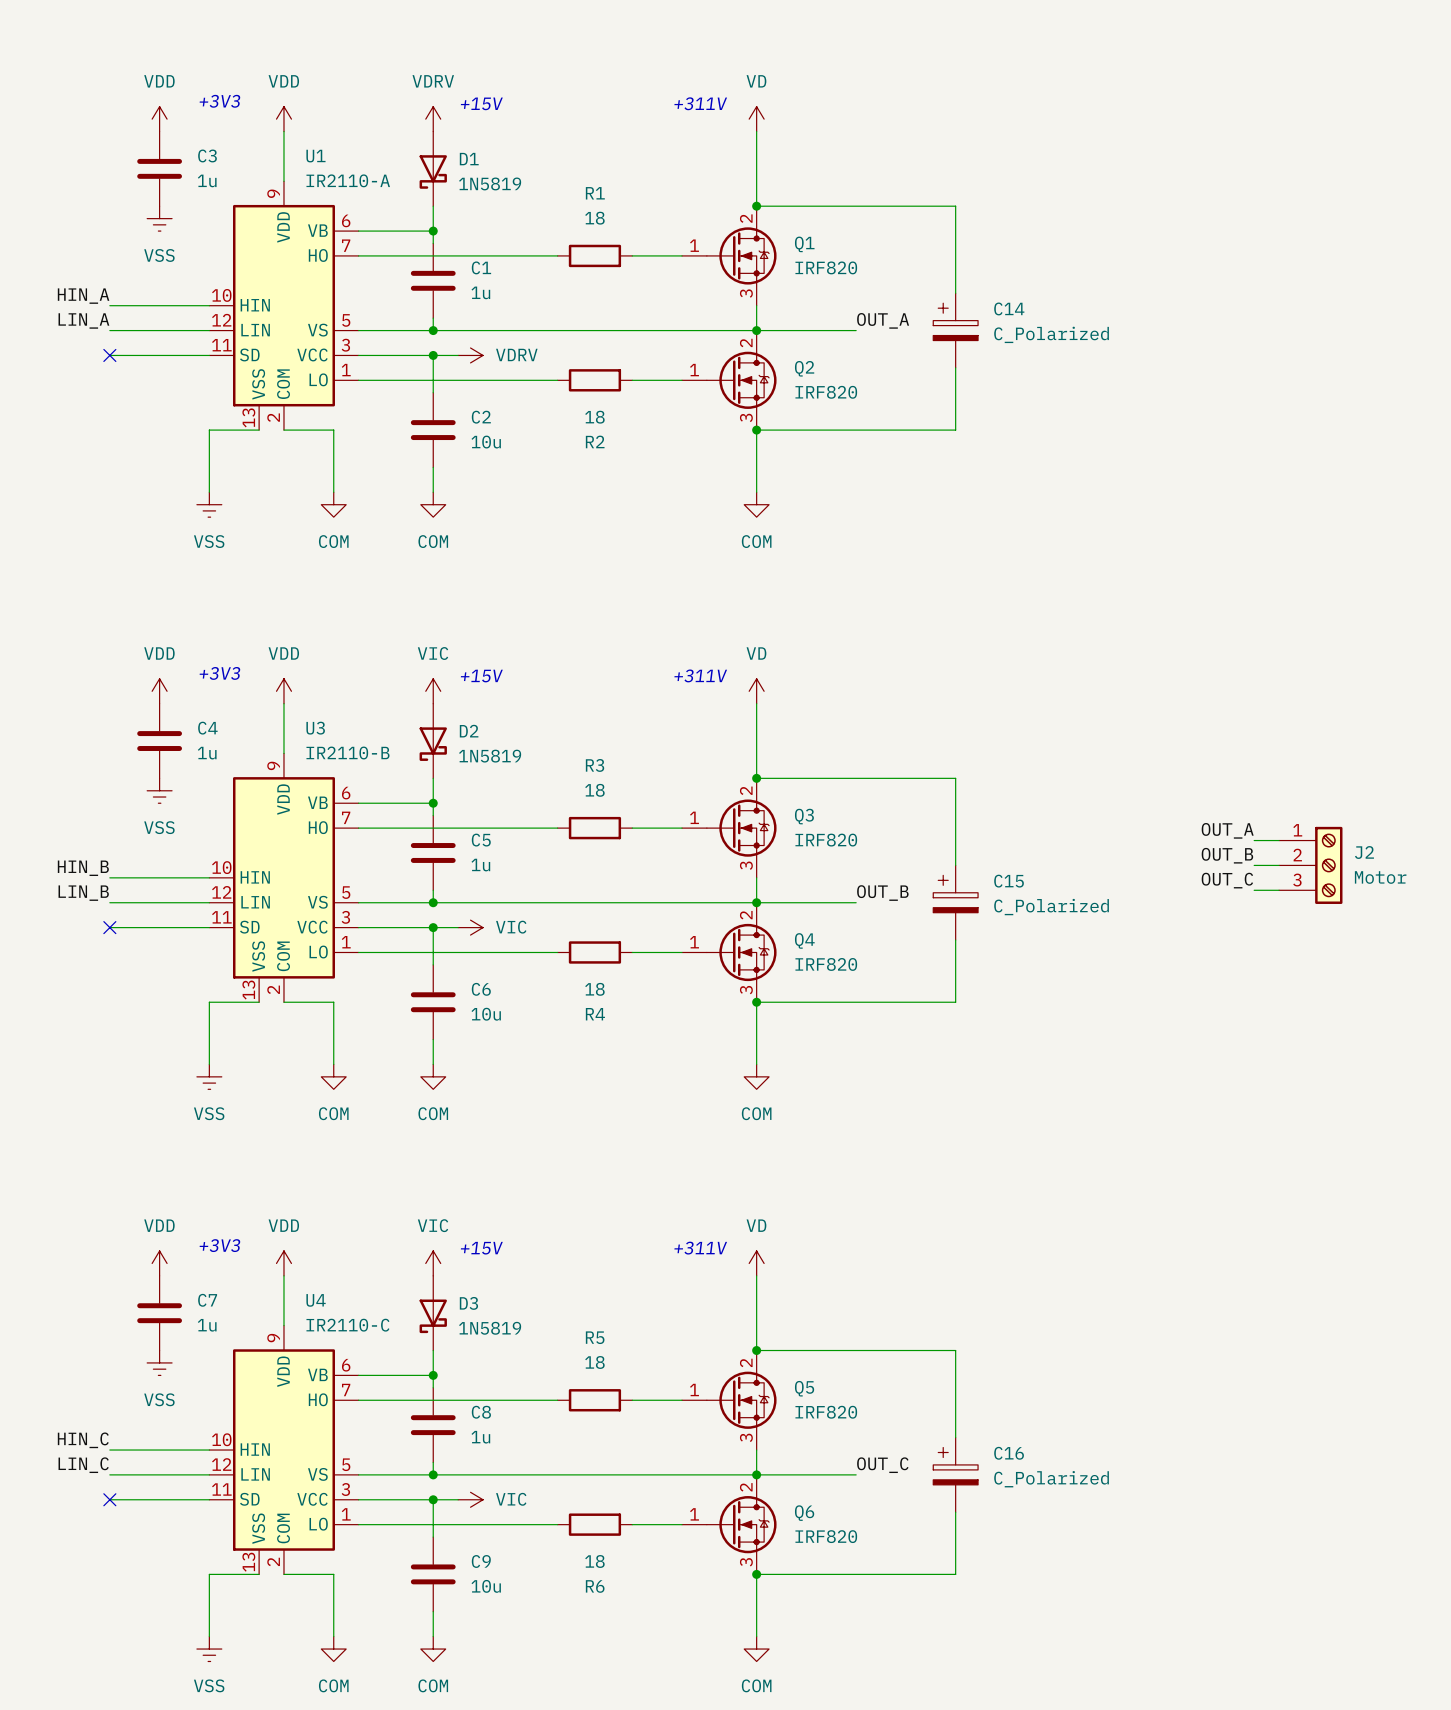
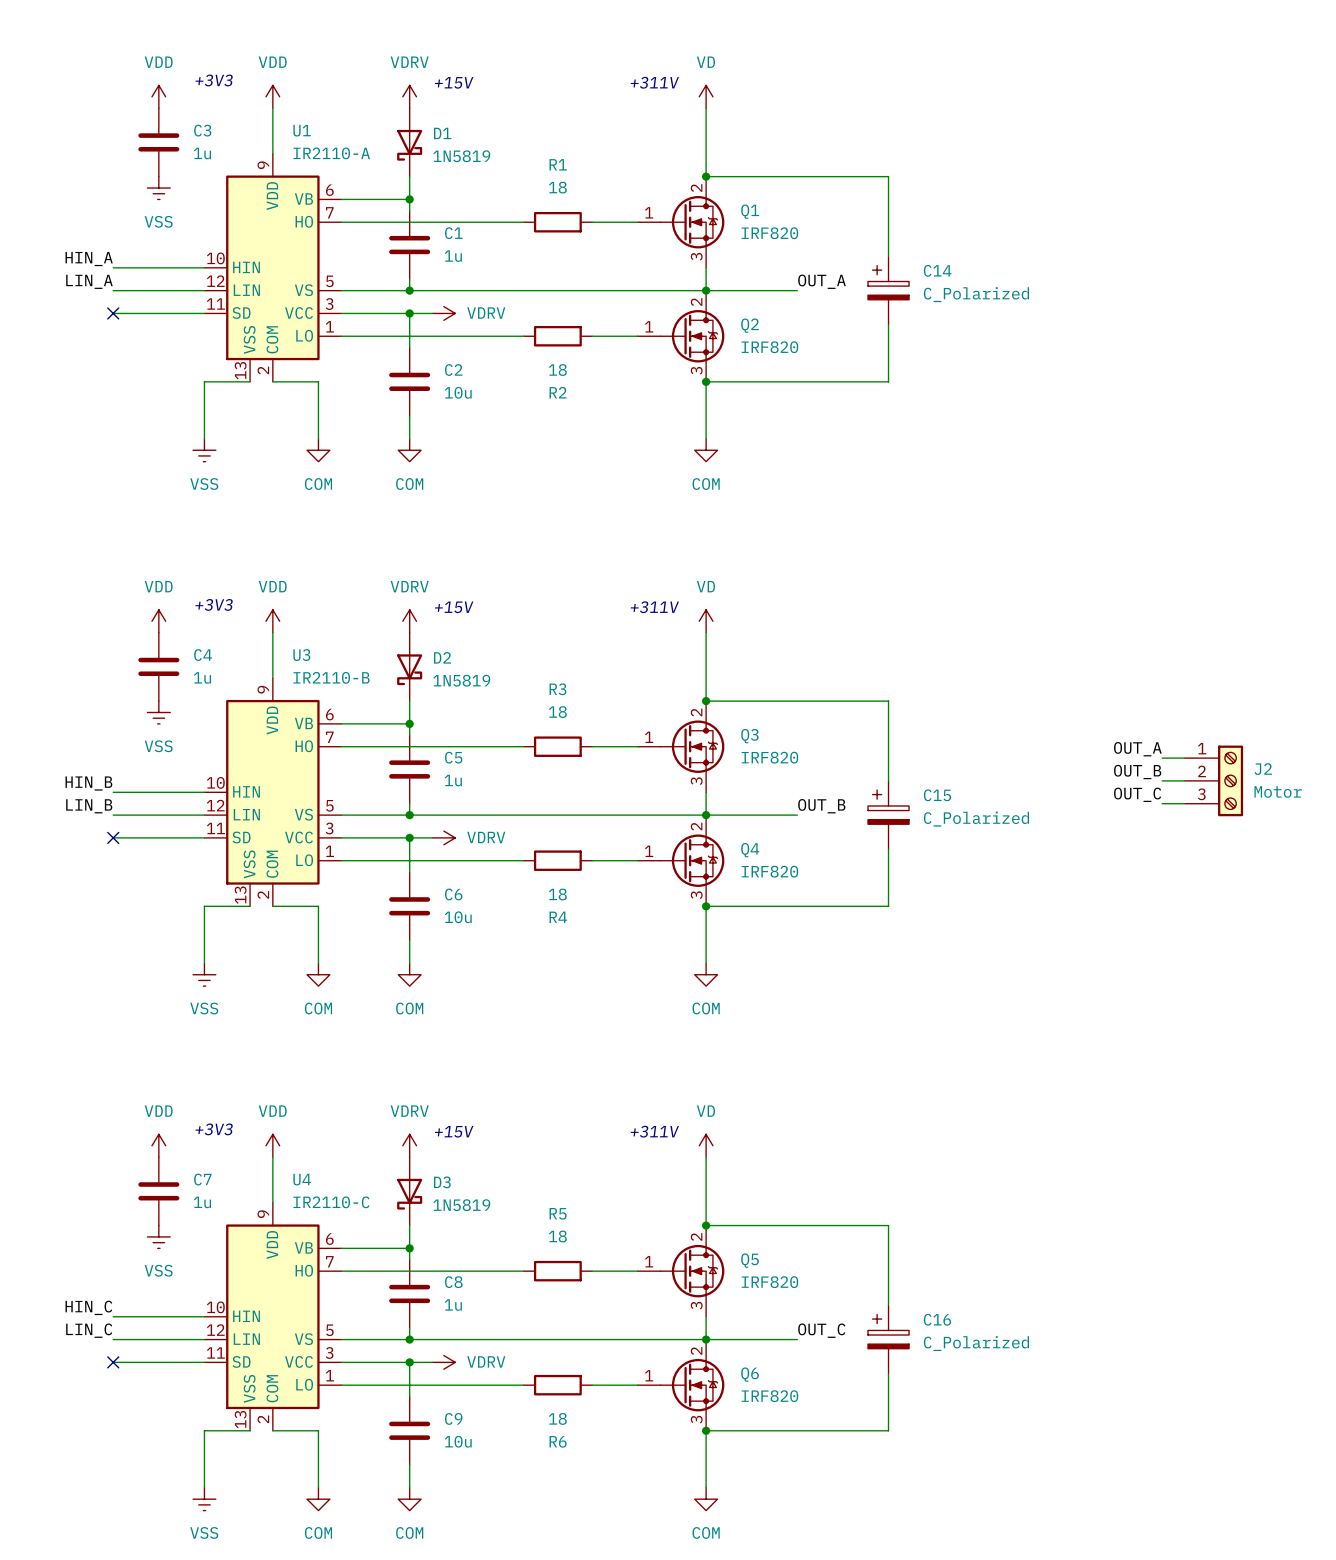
power symbol: VIC (433, 691) -> VDRV (409, 621)
power symbol: VIC (470, 927) -> VDRV (443, 837)
power symbol: VIC (433, 1263) -> VDRV (409, 1145)
power symbol: VIC (470, 1499) -> VDRV (443, 1362)

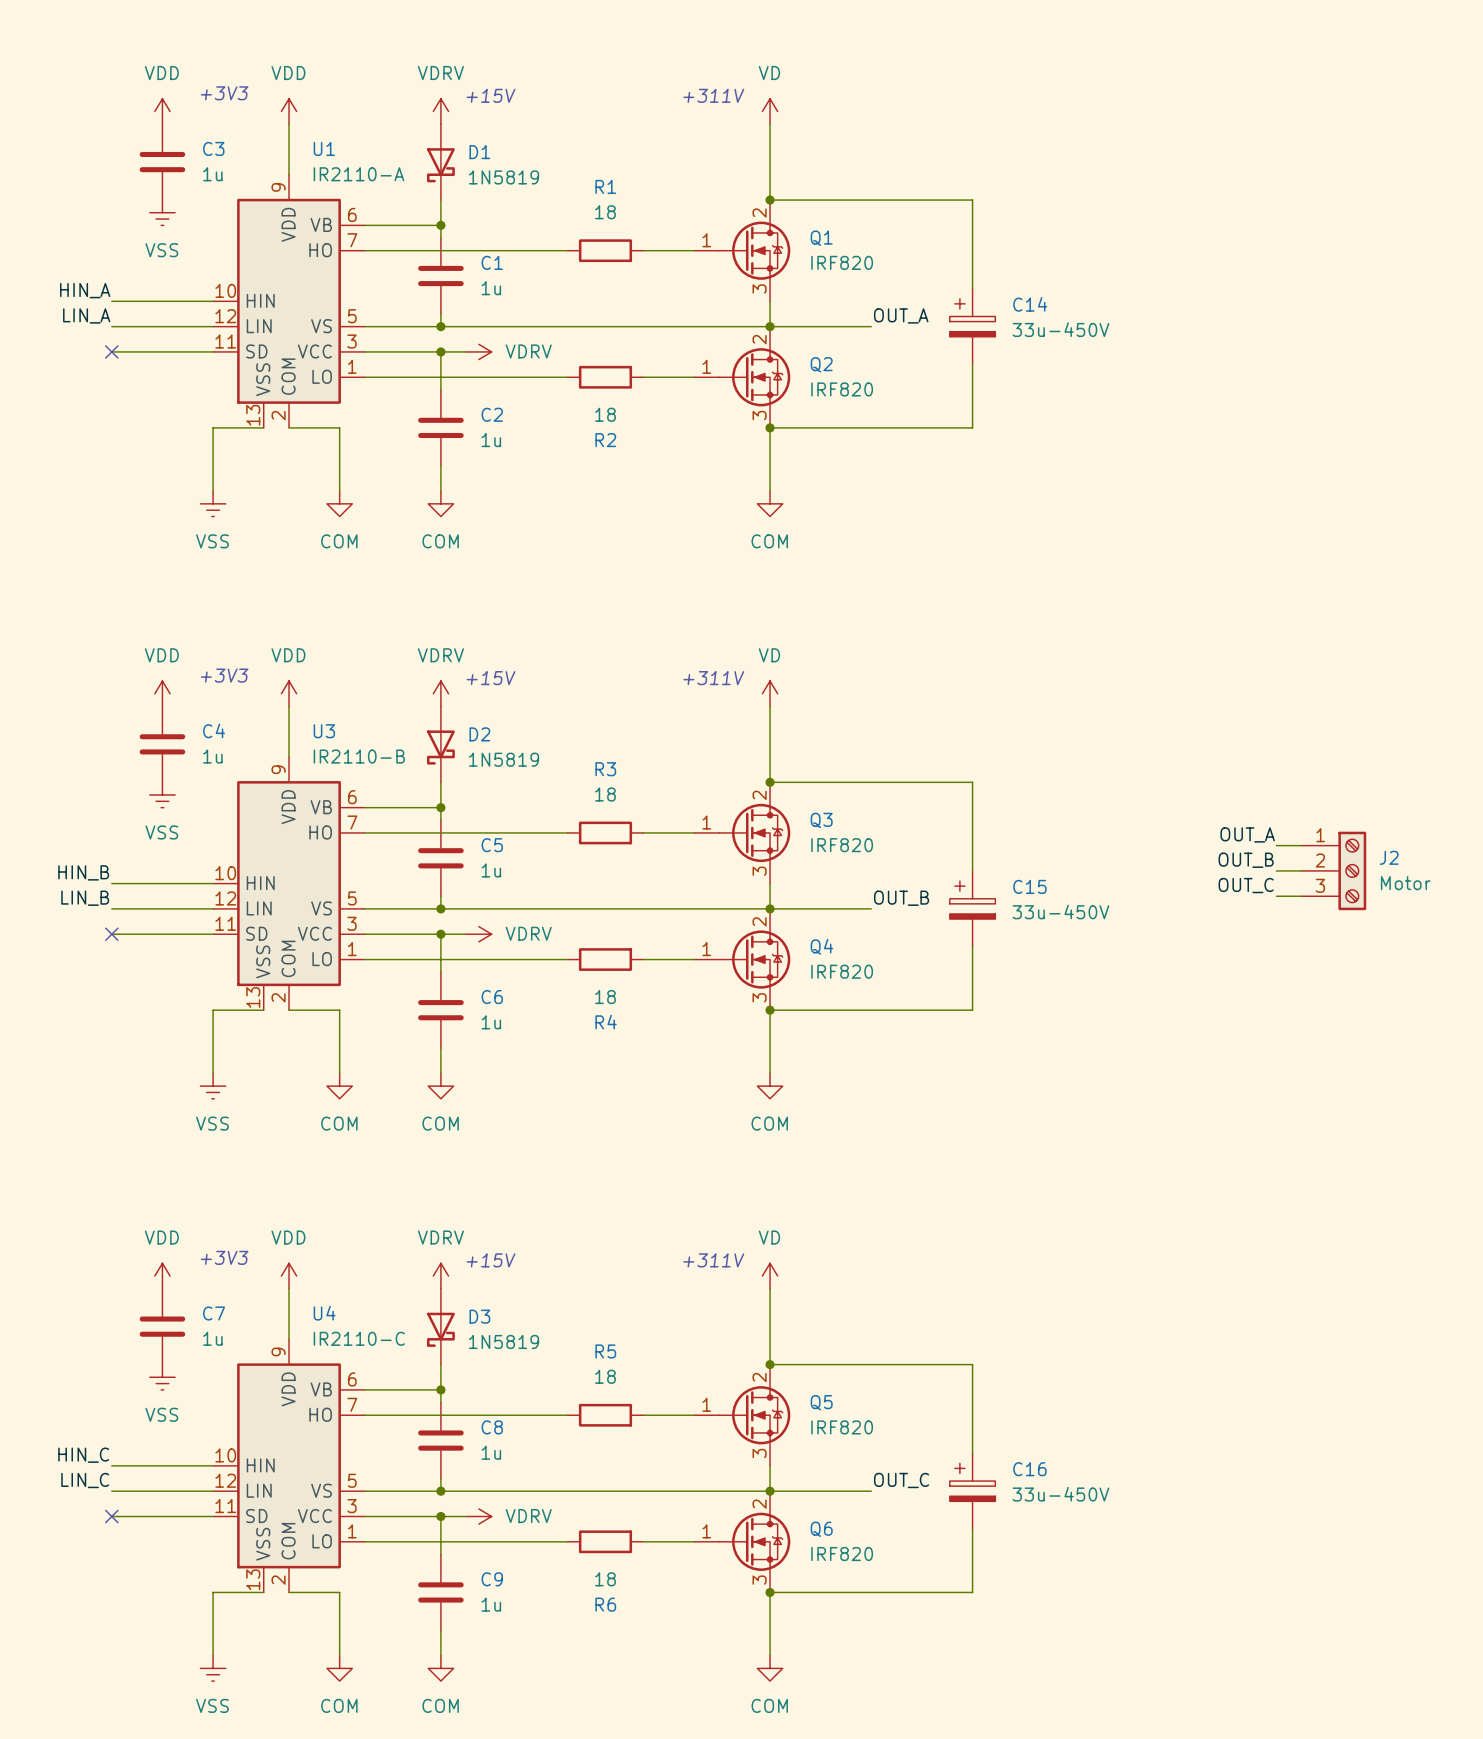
C14 value: C_Polarized (976, 294) -> 33u-450V (1060, 329)
C2 value: 10u (458, 392) -> 1u (491, 440)
C15 value: C_Polarized (976, 819) -> 33u-450V (1060, 911)
C6 value: 10u (458, 917) -> 1u (491, 1022)
C16 value: C_Polarized (976, 1343) -> 33u-450V (1060, 1494)
C9 value: 10u (458, 1441) -> 1u (491, 1604)

